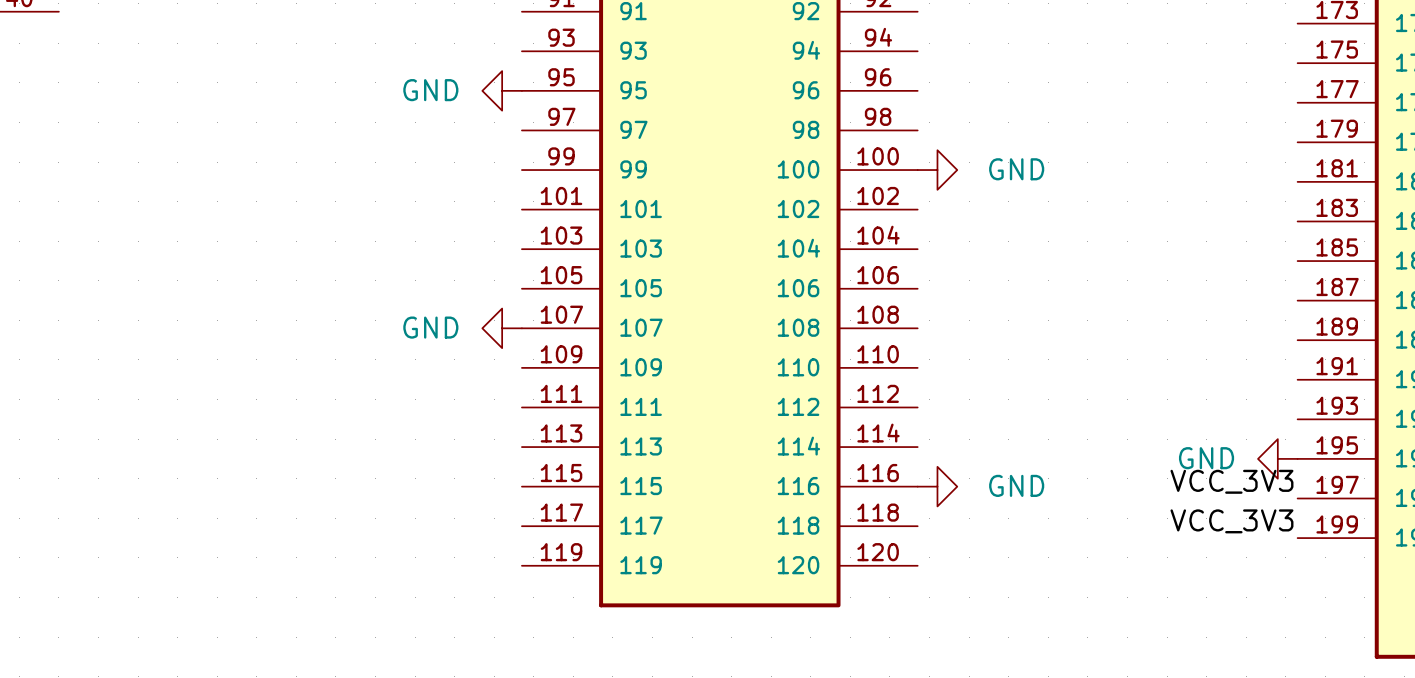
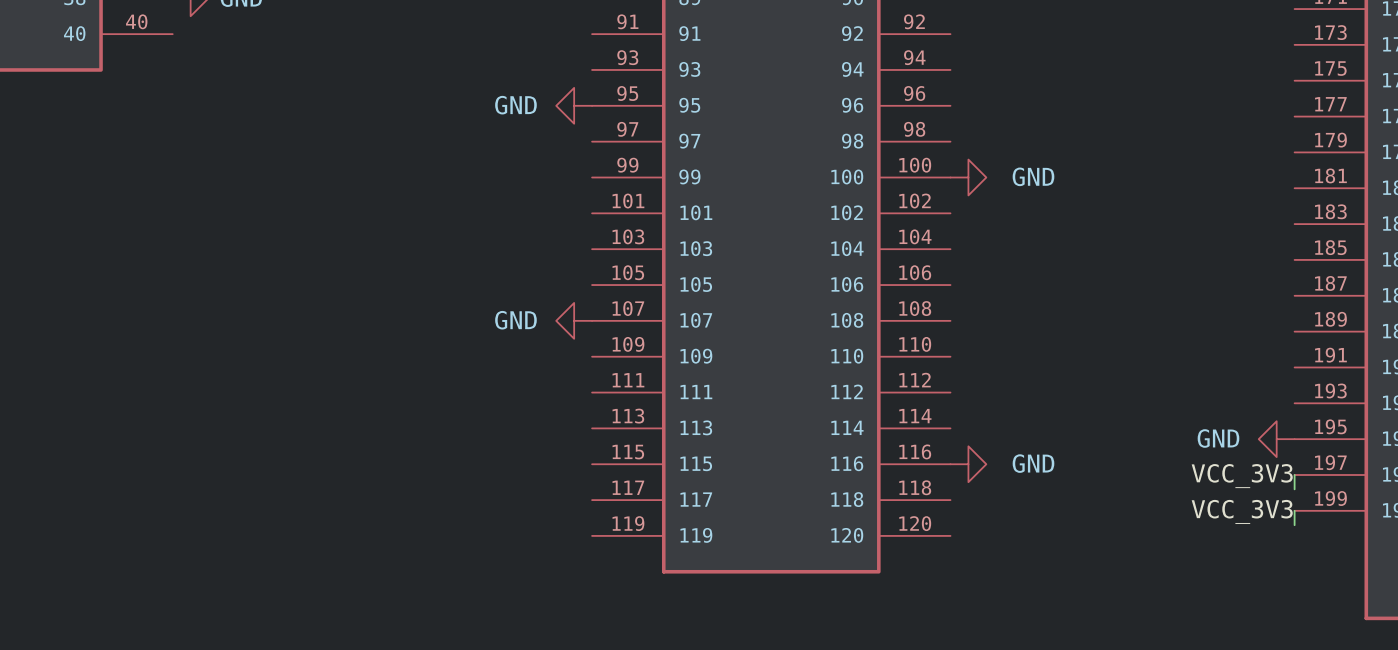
label: VCC_3V3 (1231, 481) -> none
label: none -> VCC_3V3 (1242, 476)
wire: none -> (1294, 475) (1294, 489)
label: VCC_3V3 (1231, 521) -> none
label: none -> VCC_3V3 (1242, 511)
wire: none -> (1294, 510) (1294, 525)

